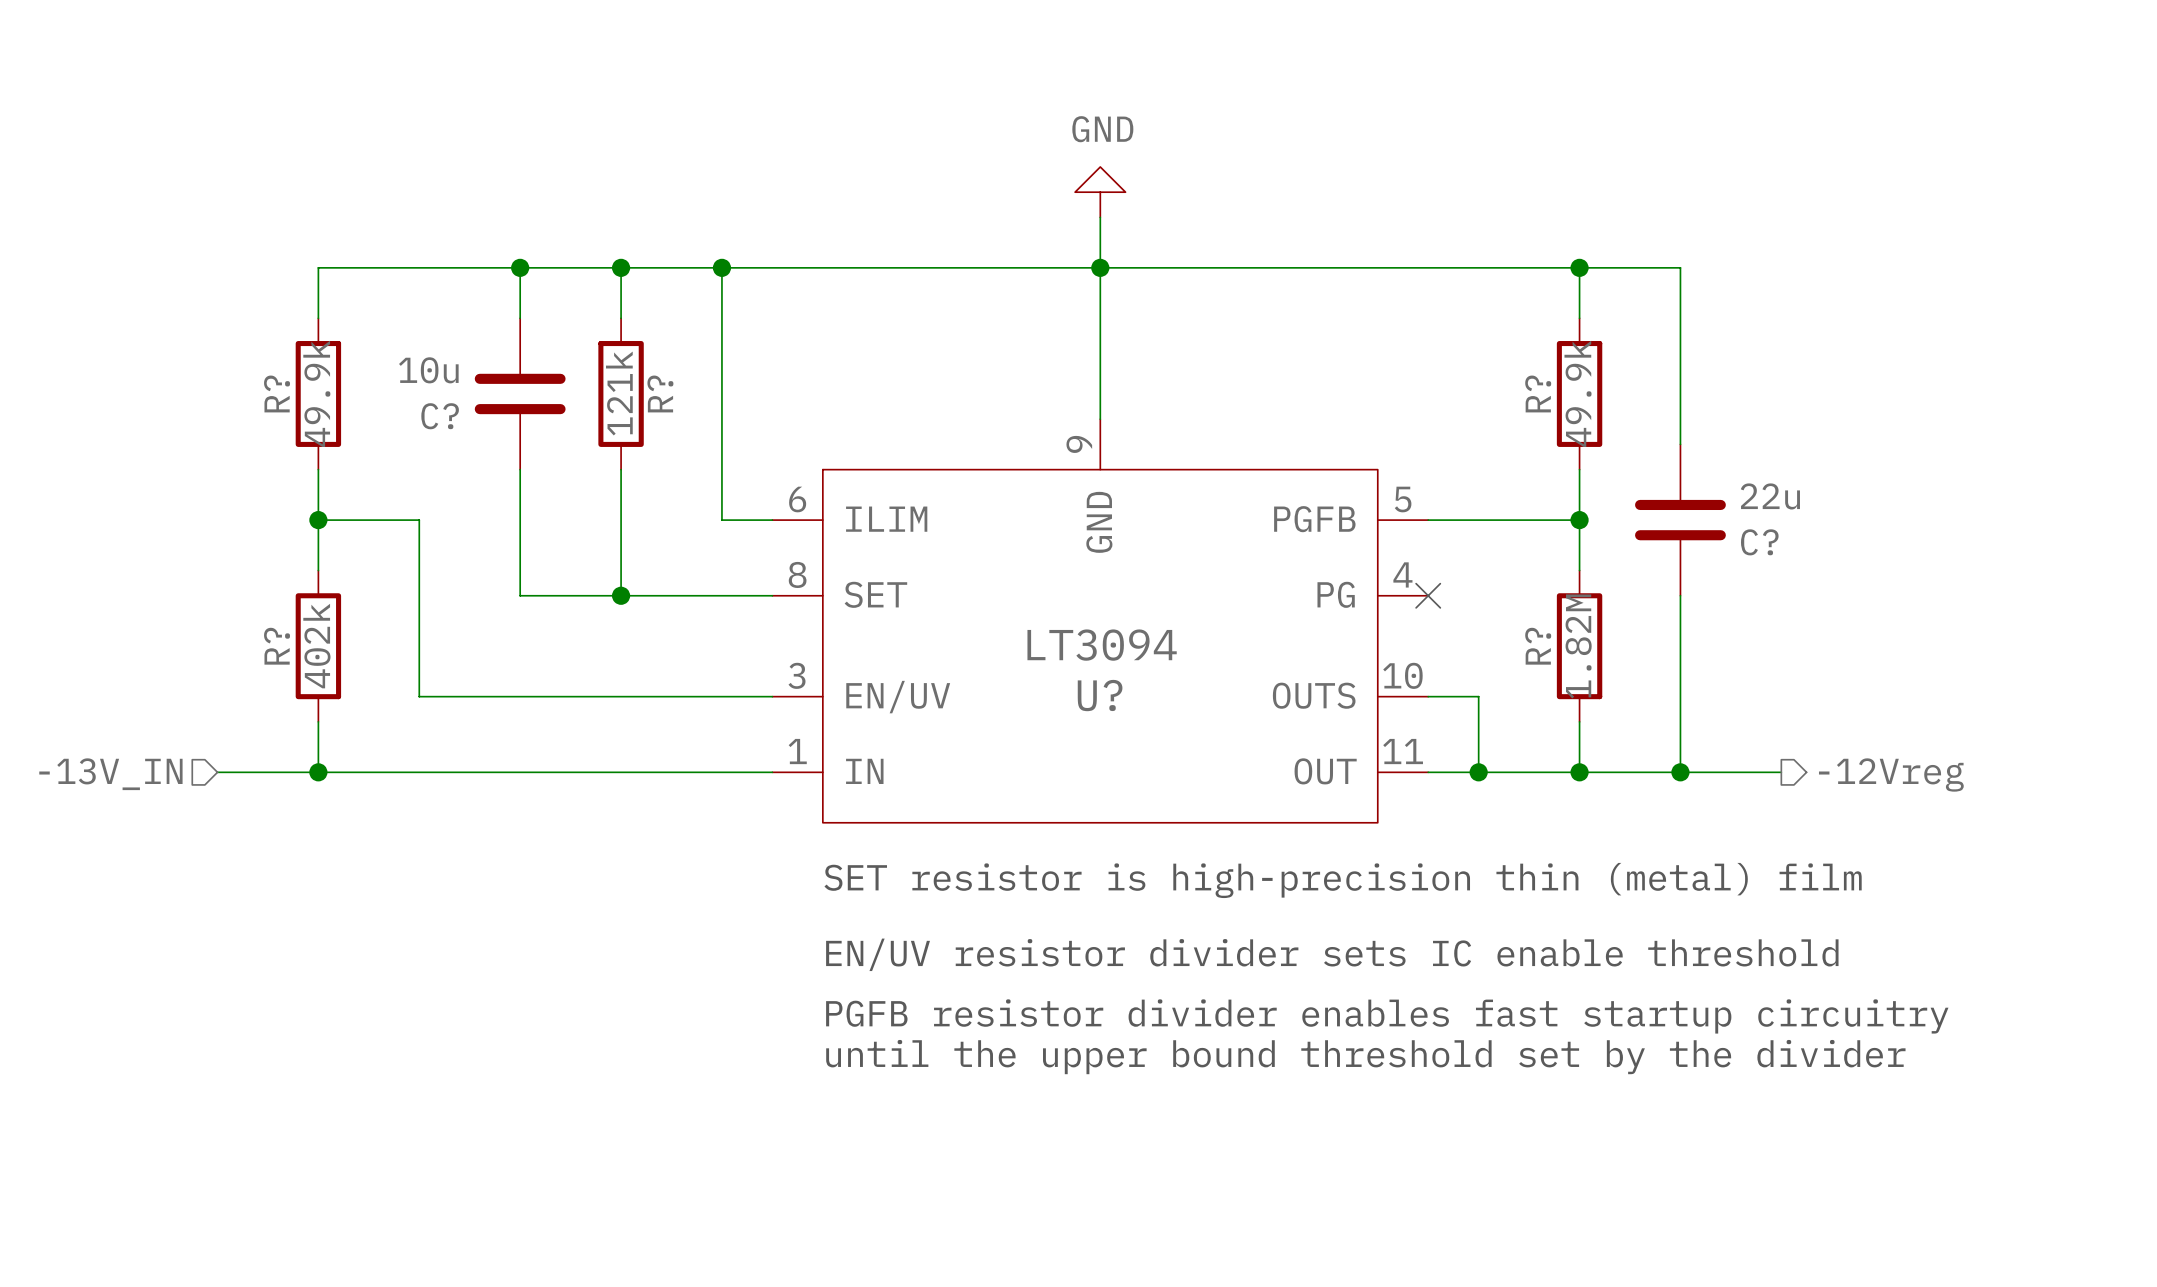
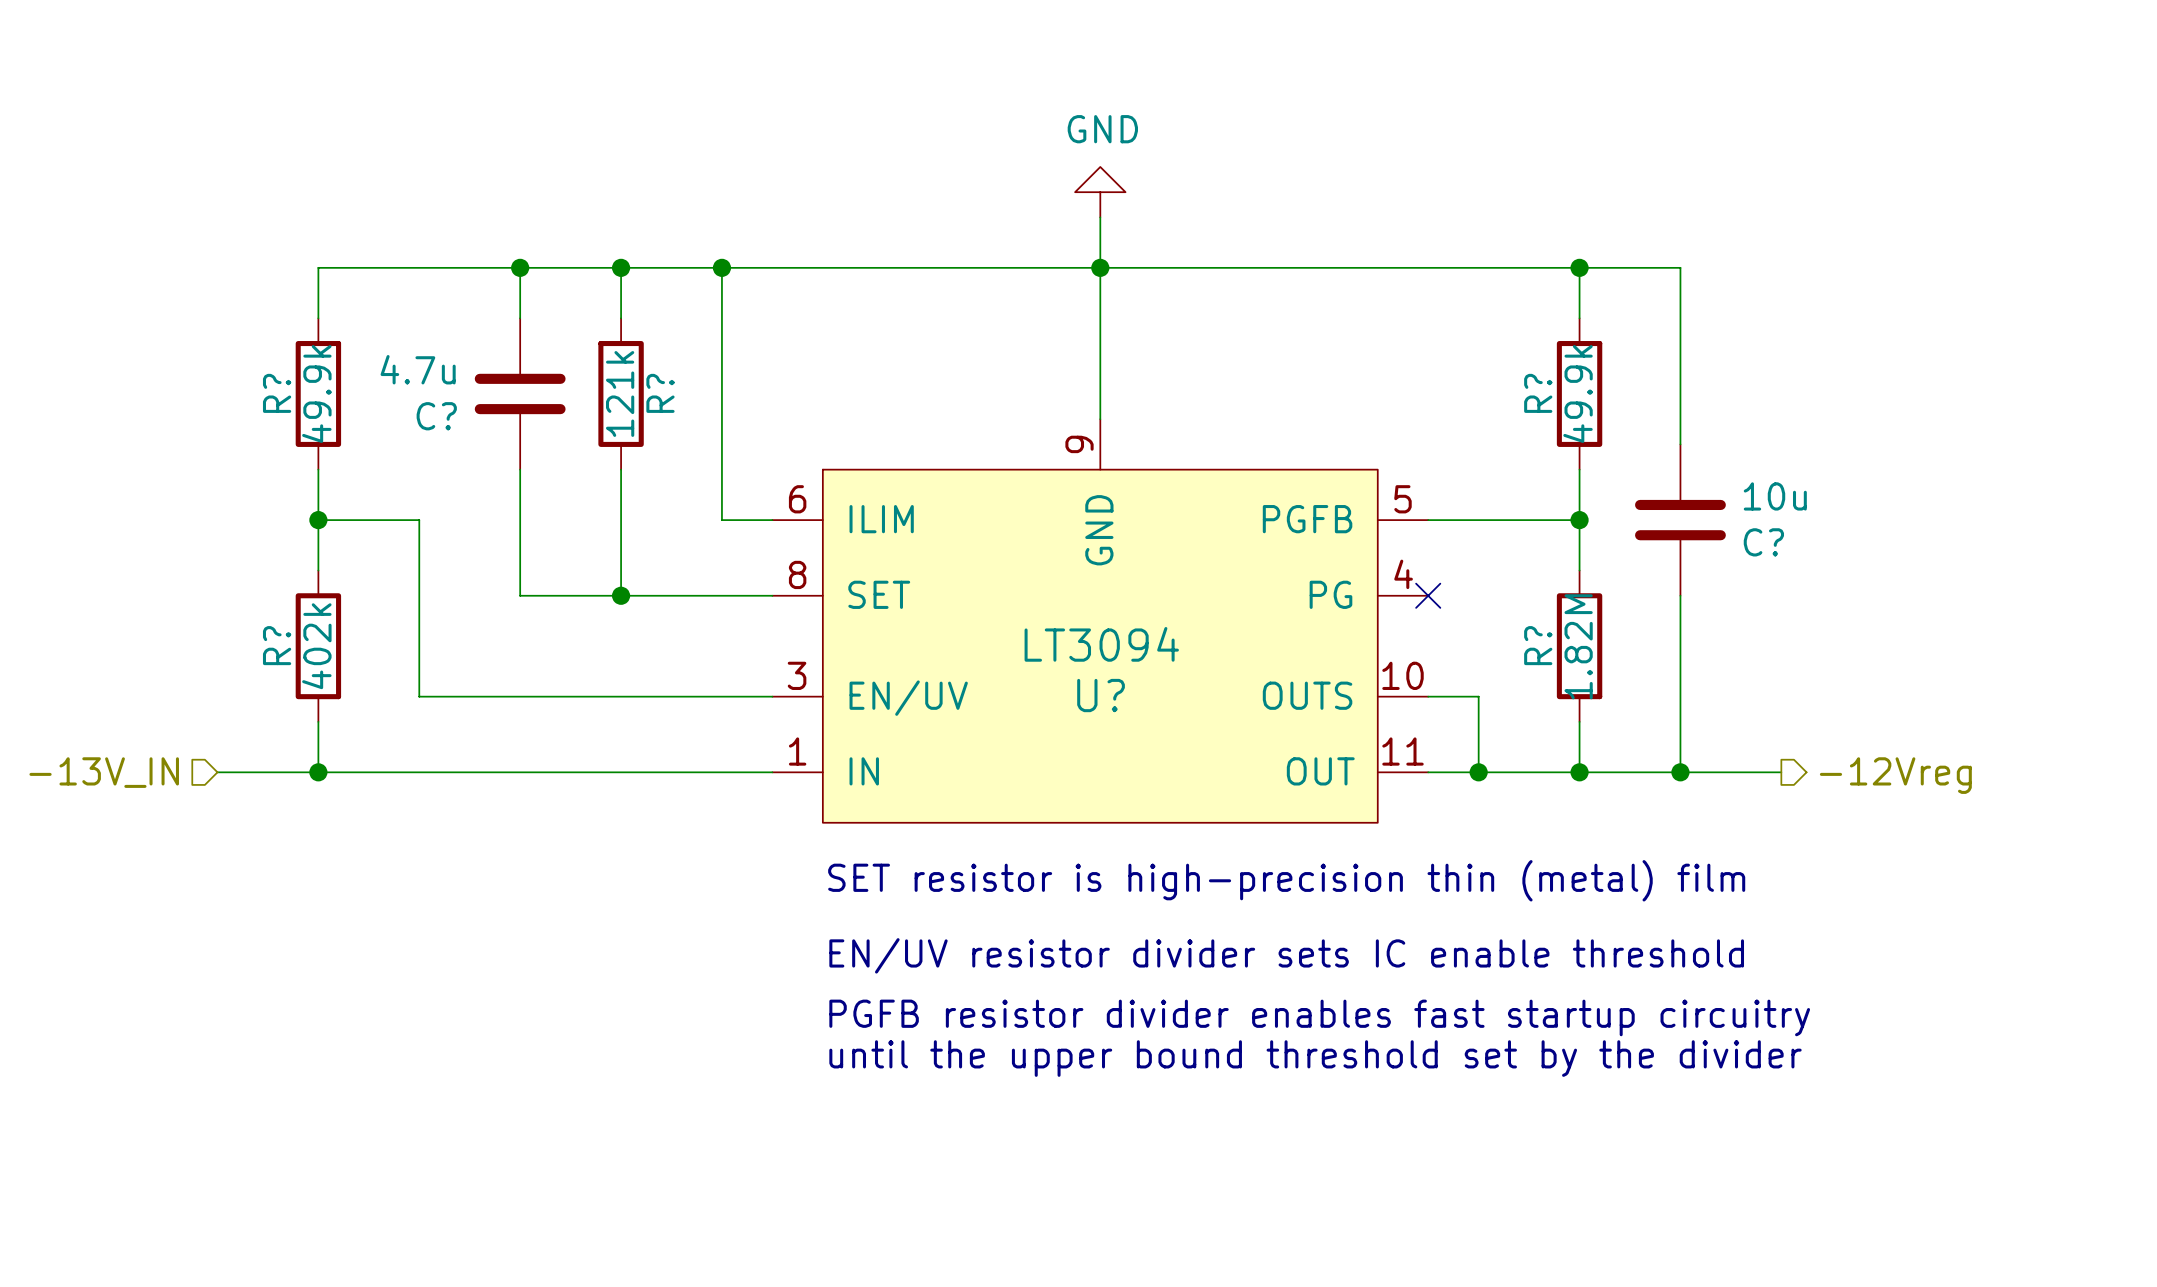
C? value: 10u (428, 370) -> 4.7u (418, 369)
C? value: 22u (1770, 496) -> 10u (1775, 496)

